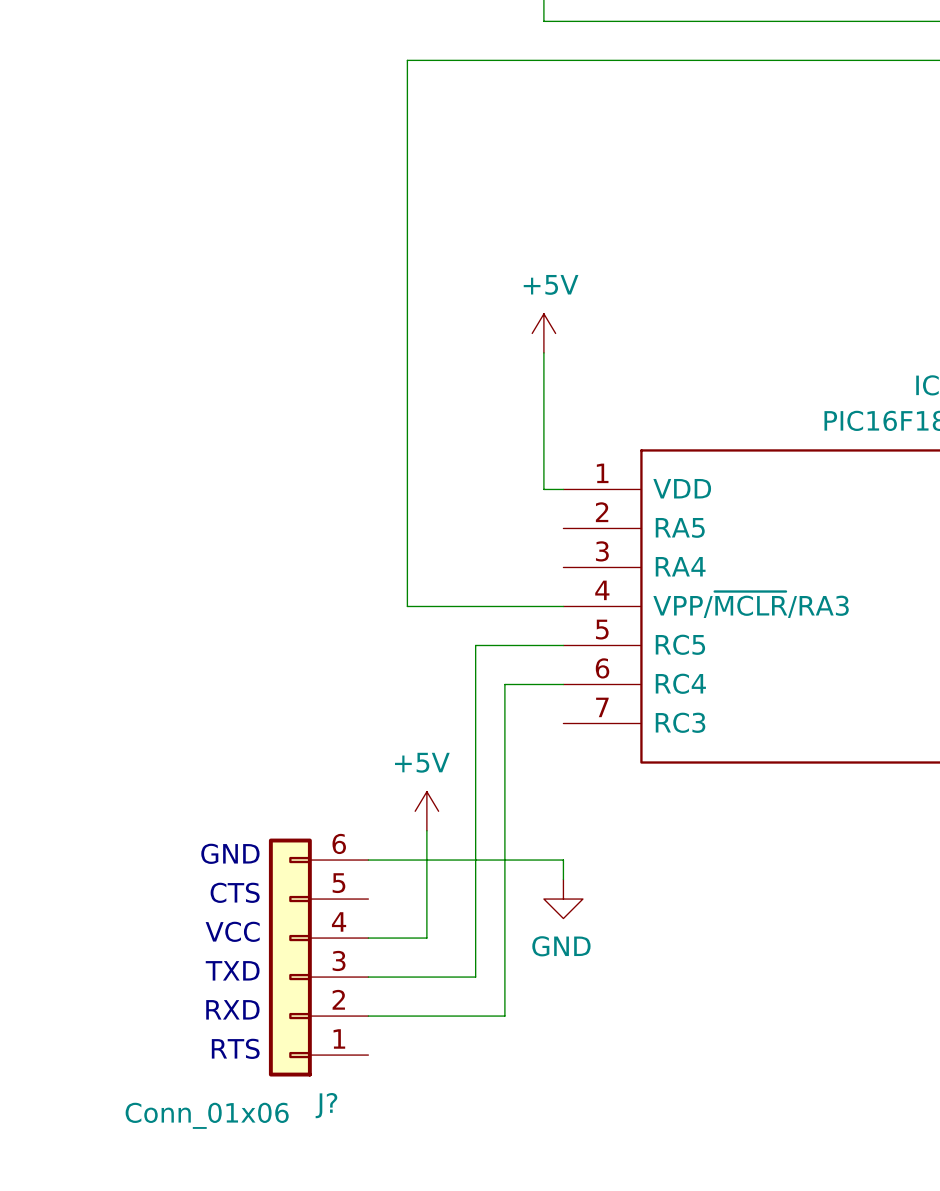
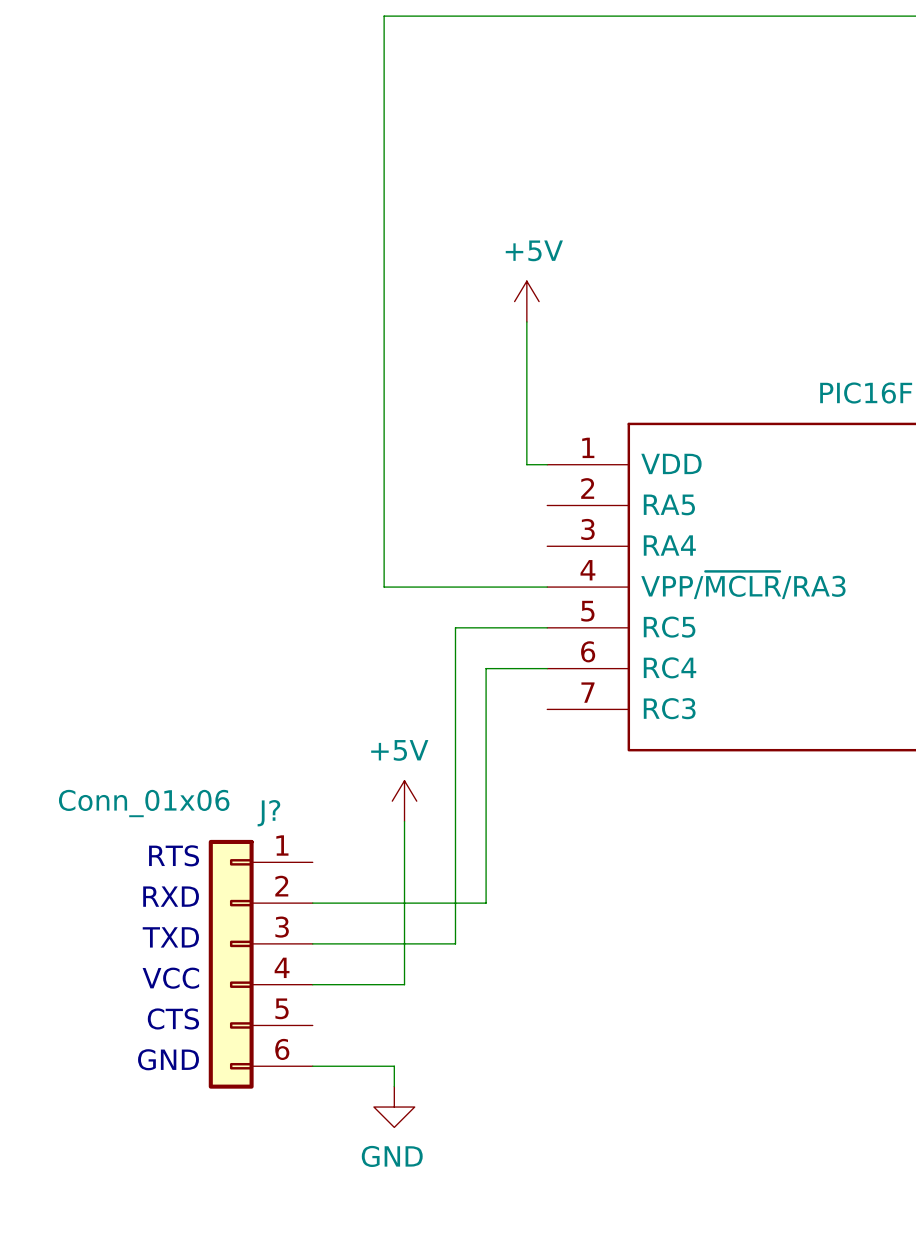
text position: GND (230, 853) -> GND (168, 1059)
wire: (368, 860) (563, 860) (563, 879) -> none
text position: CTS (235, 892) -> CTS (173, 1018)
power symbol position: GND (563, 899) -> GND (394, 1107)
wire: (504, 908) (504, 1016) (368, 1016) -> (486, 903) (312, 903)
text position: VCC (232, 931) -> VCC (170, 978)
wire: (368, 938) (426, 938) -> (312, 984) (404, 984) (404, 933)
wire: (475, 947) (475, 977) (368, 977) -> (455, 943) (312, 943)
J?: Conn_01x06 (318, 957) -> none
J?: none -> Conn_01x06 (260, 964)
text position: TXD (232, 970) -> TXD (170, 937)
text position: RXD (232, 1009) -> RXD (171, 896)
text position: RTS (235, 1048) -> RTS (174, 855)
wire: none -> (312, 1066) (394, 1066) (394, 1086)

